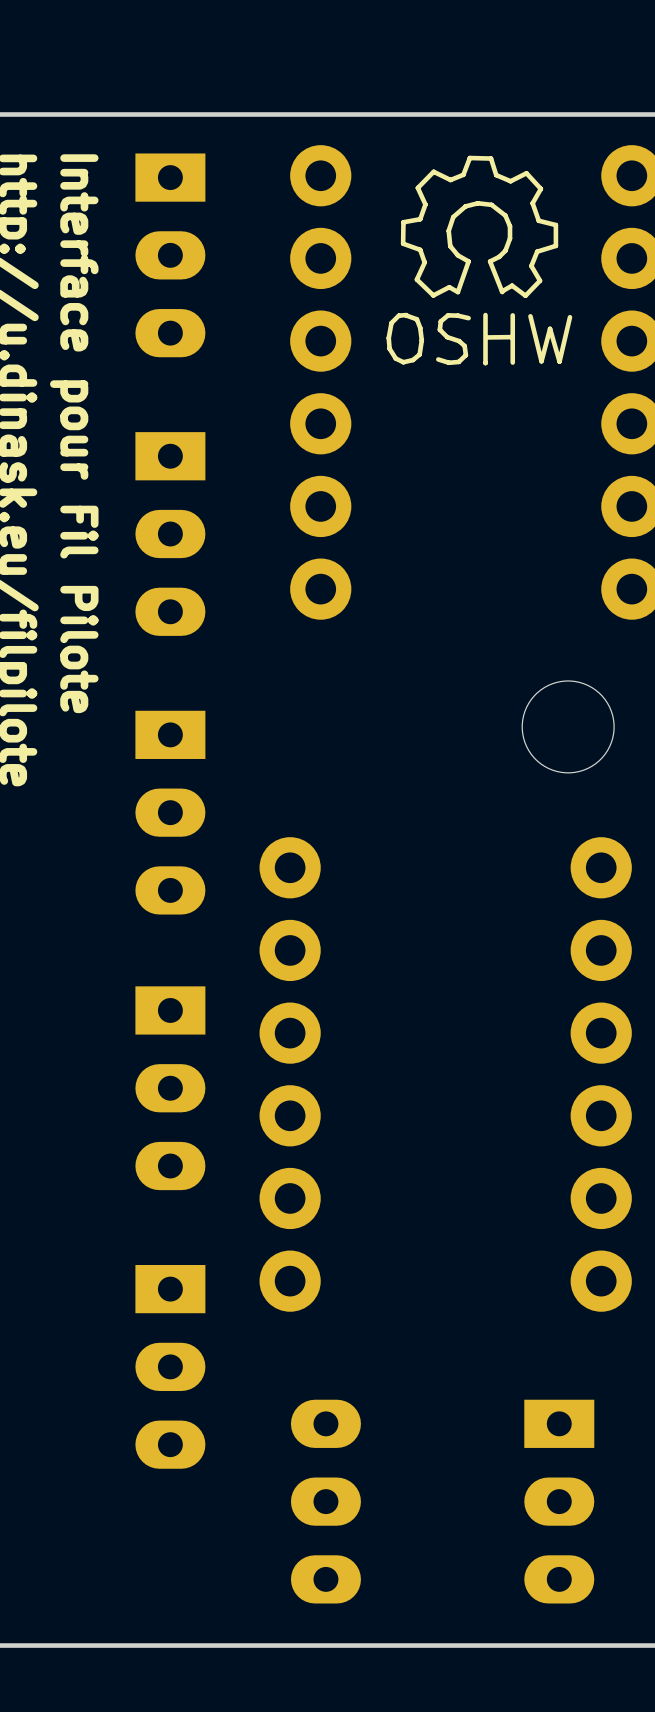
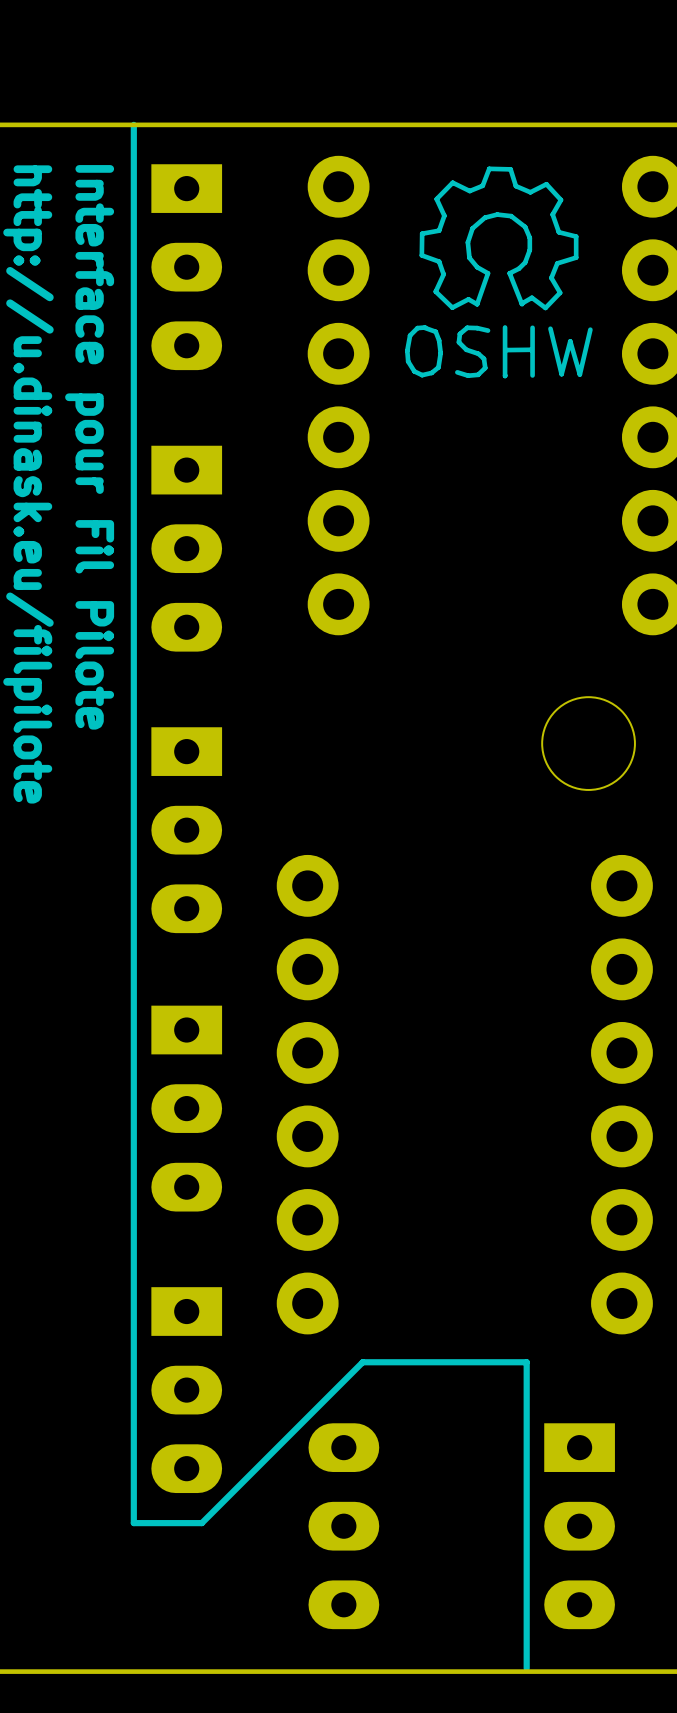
line: none -> (133, 124) (133, 1523) (201, 1523) (362, 1362) (526, 1362) (526, 1668)

